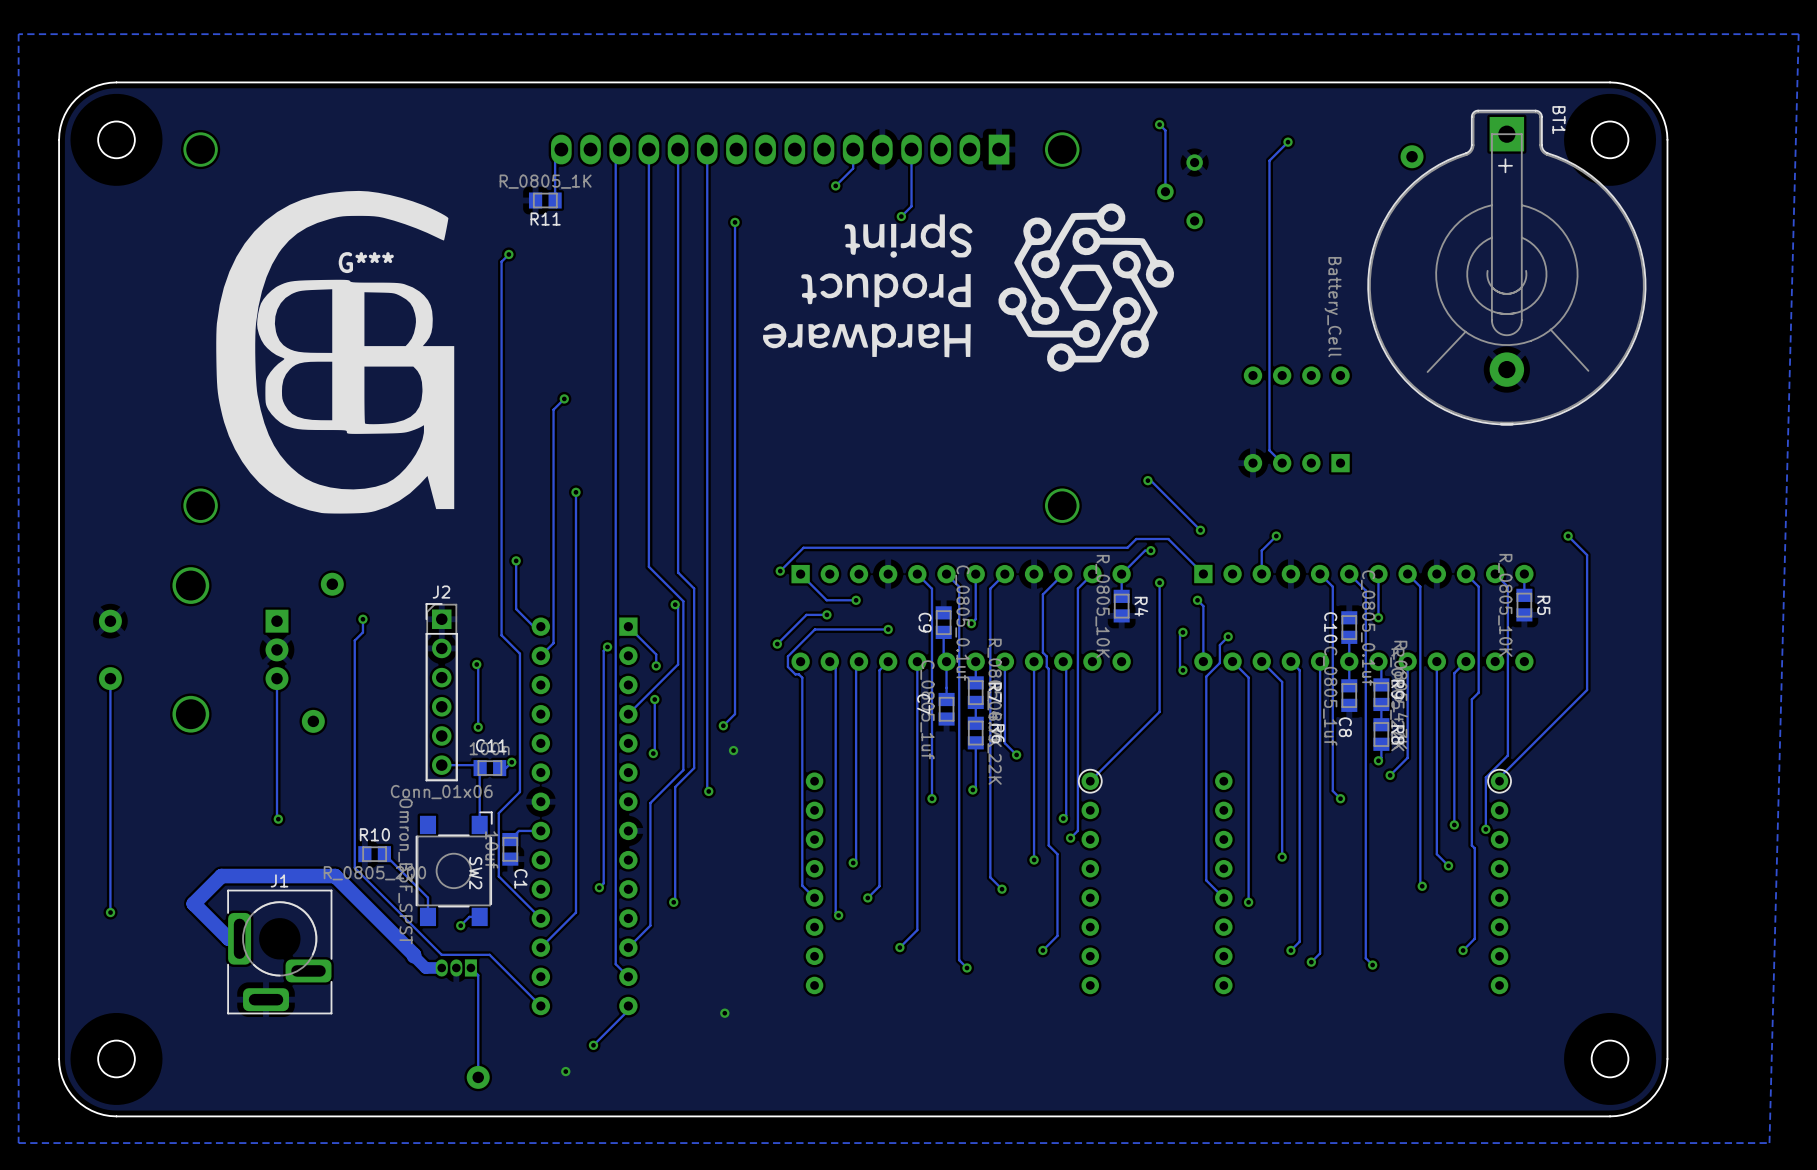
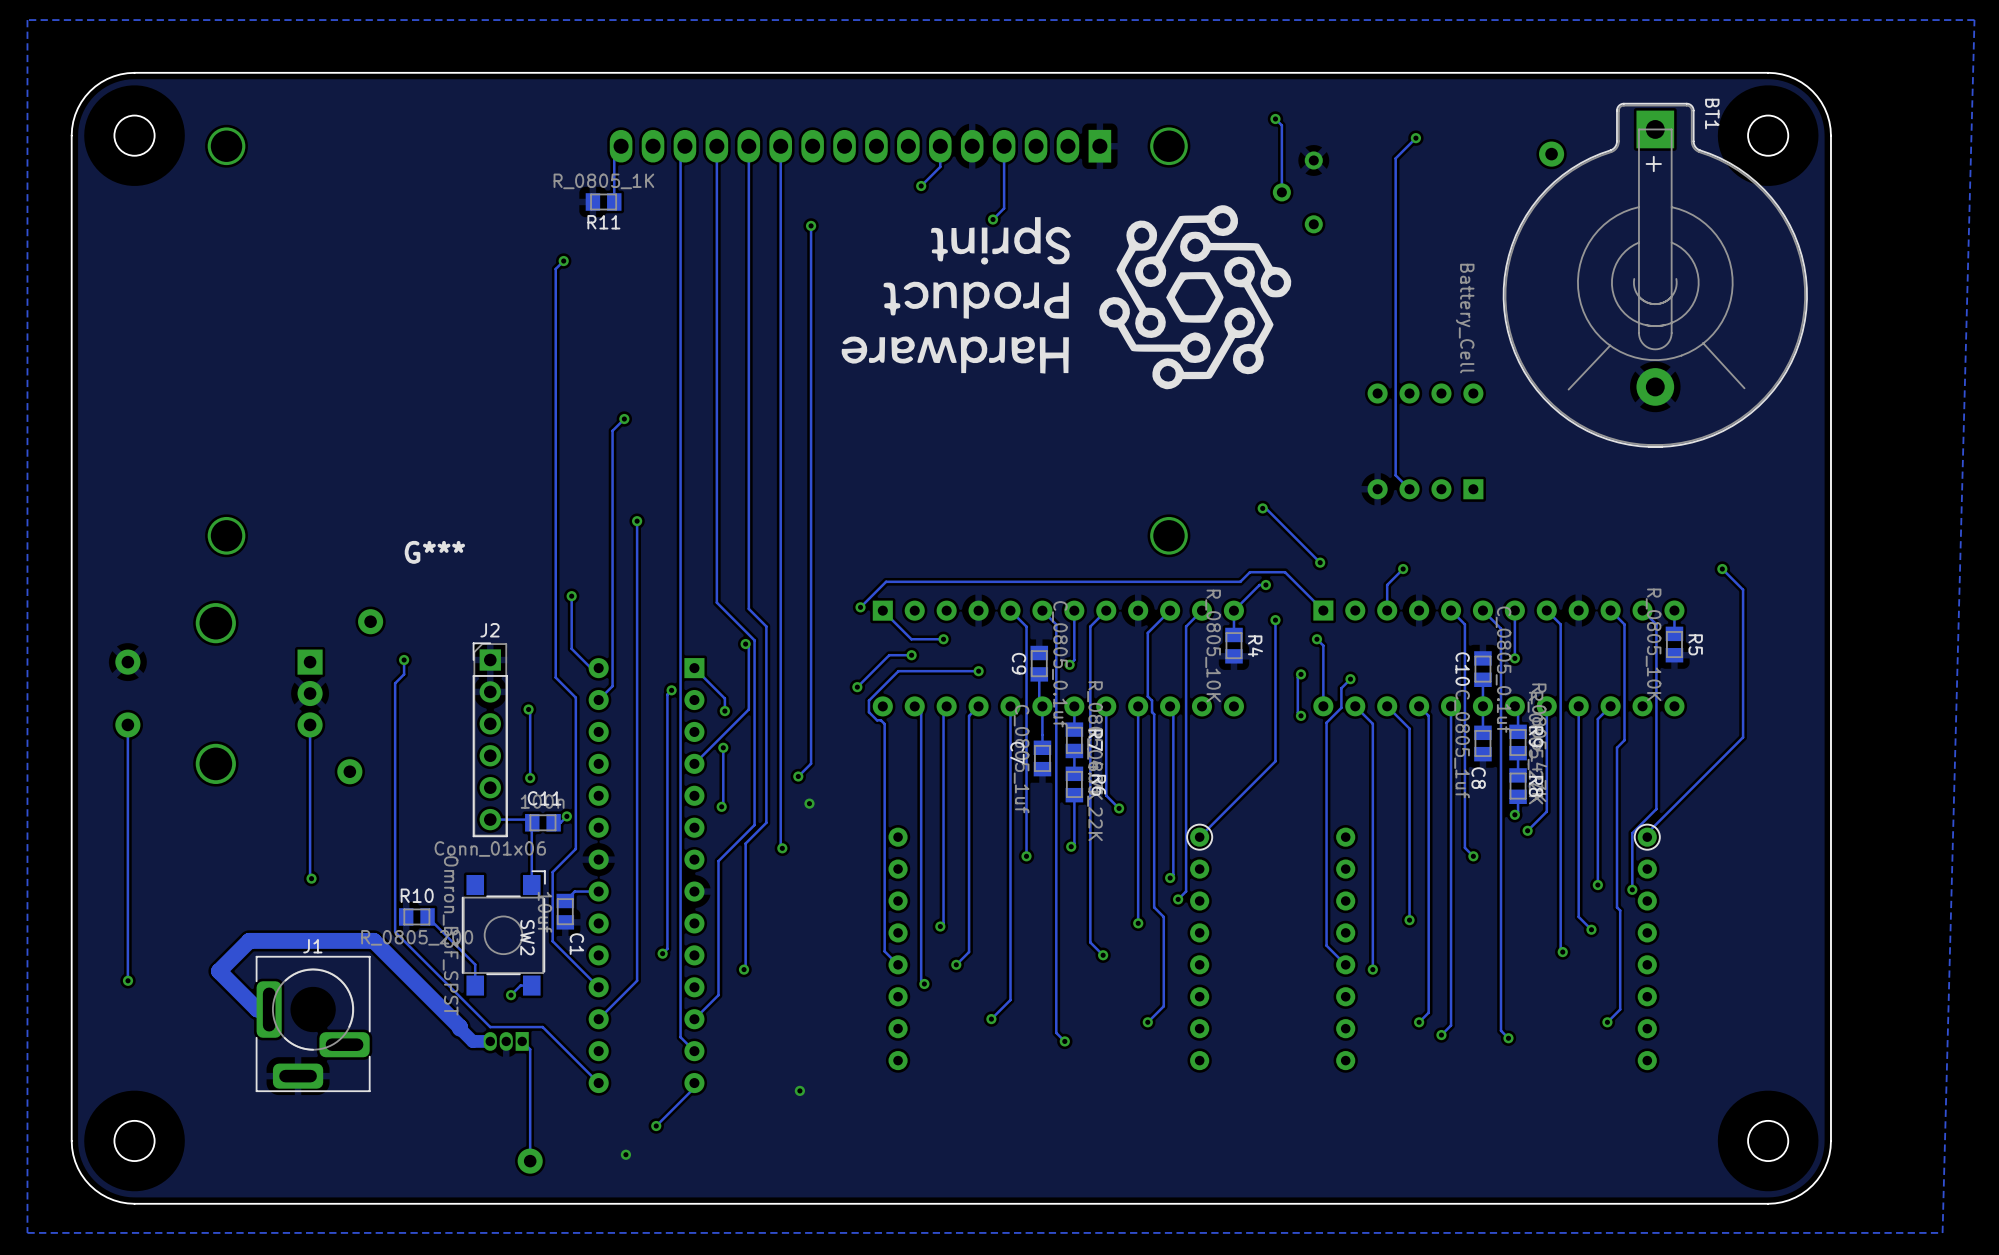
G***: (335, 352) -> none
G***: none -> (434, 552)

